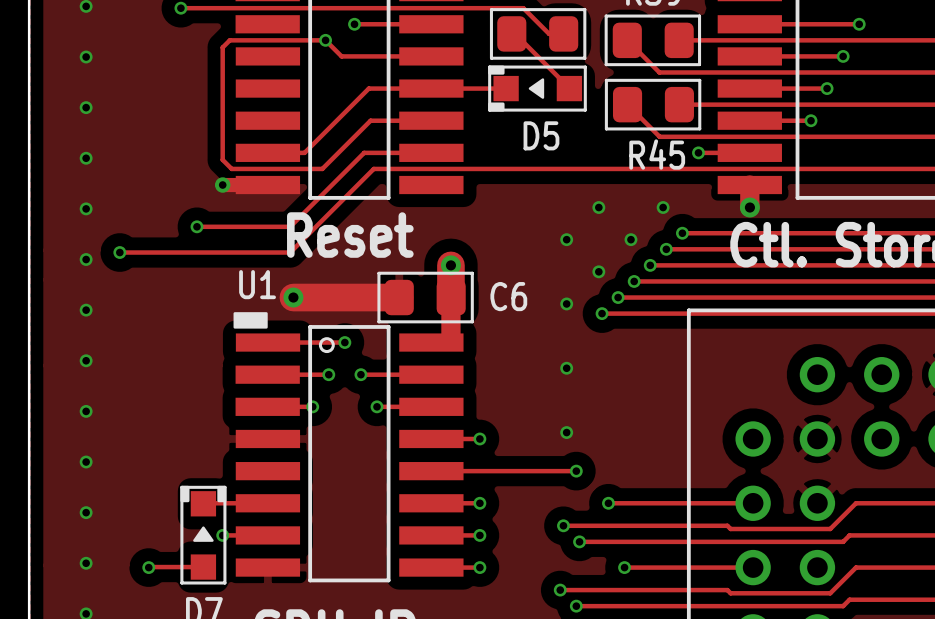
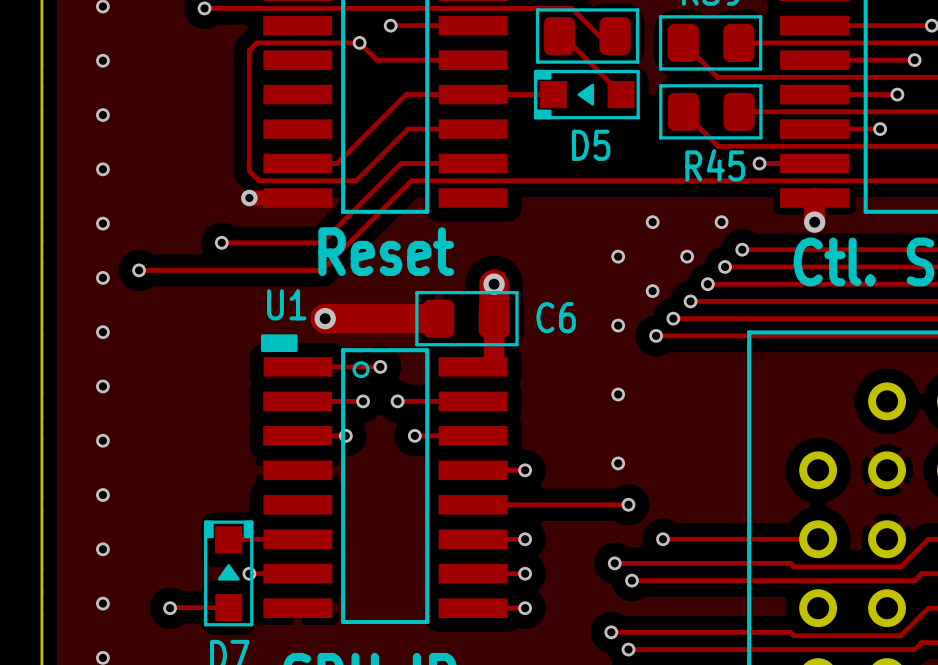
track: (624, 567) (753, 567) -> none
via: (624, 567) -> none

